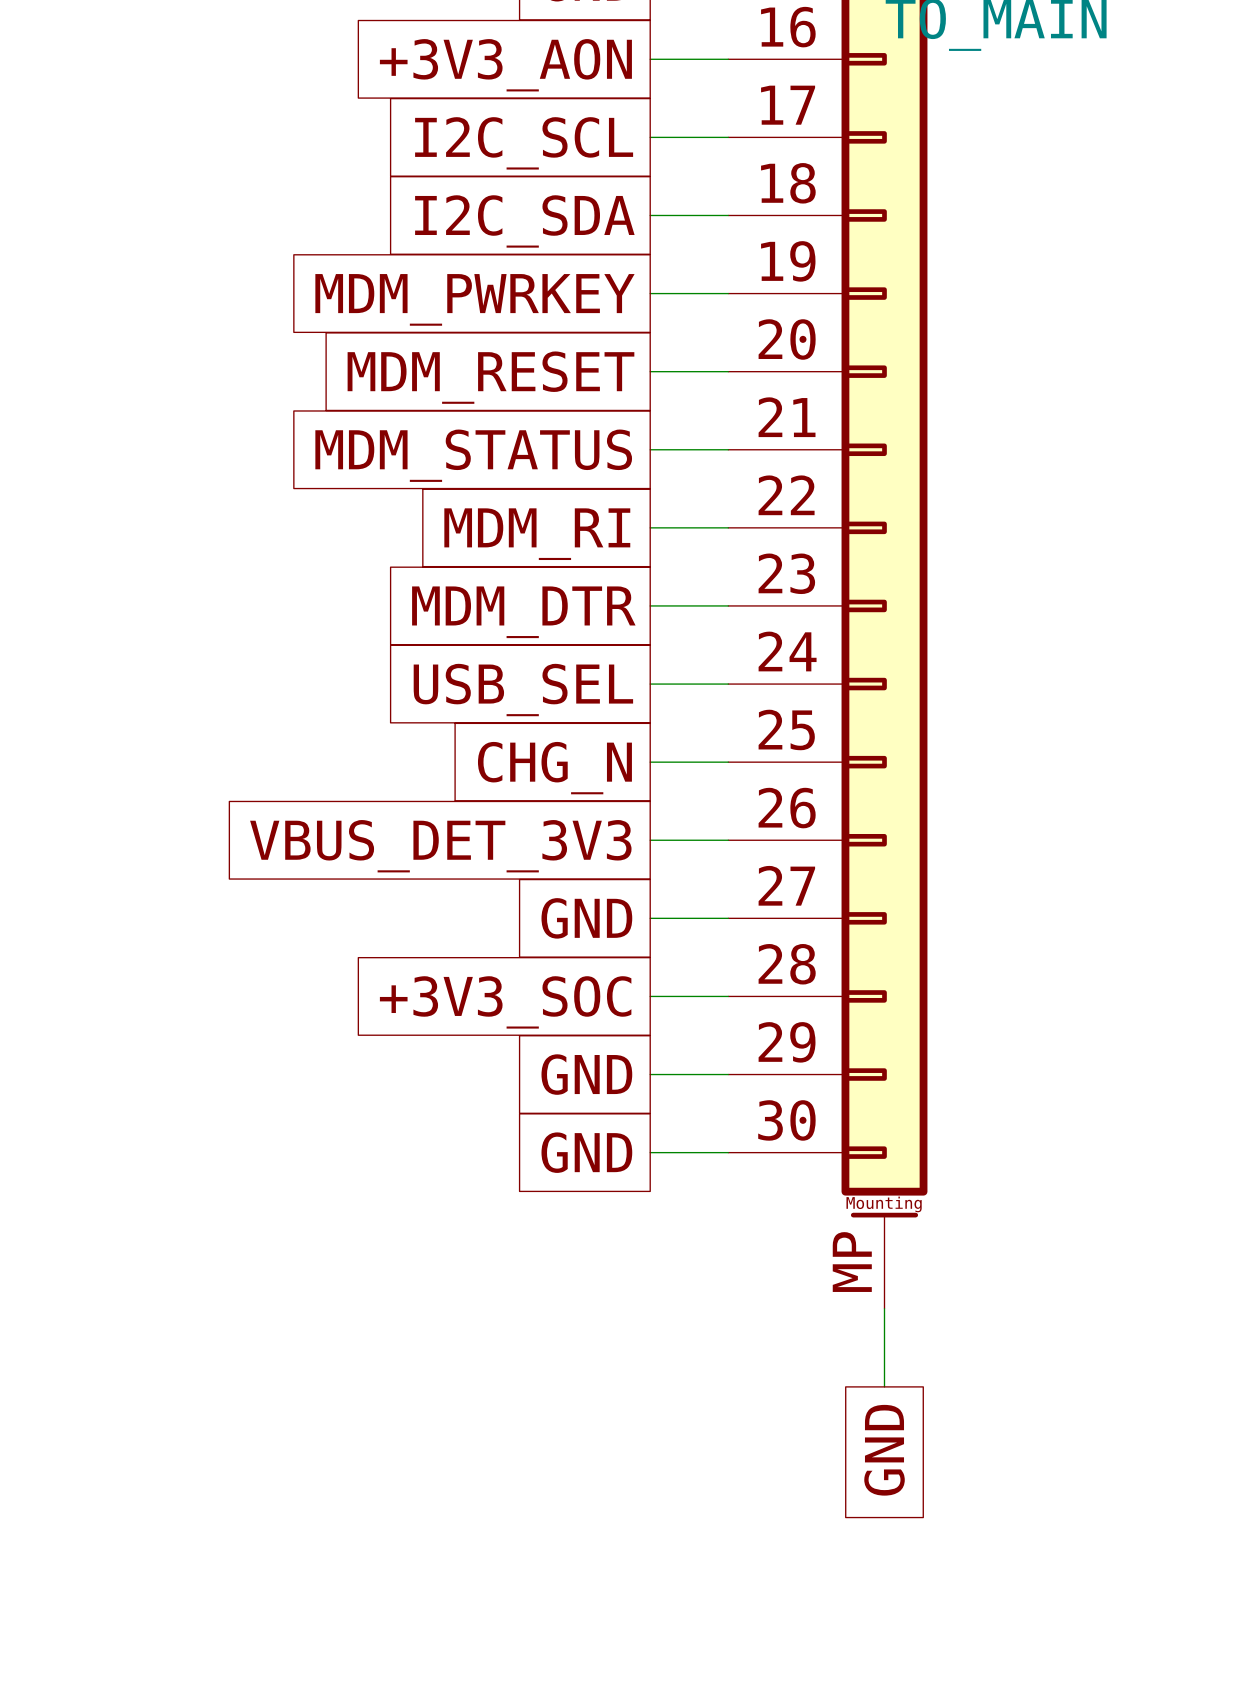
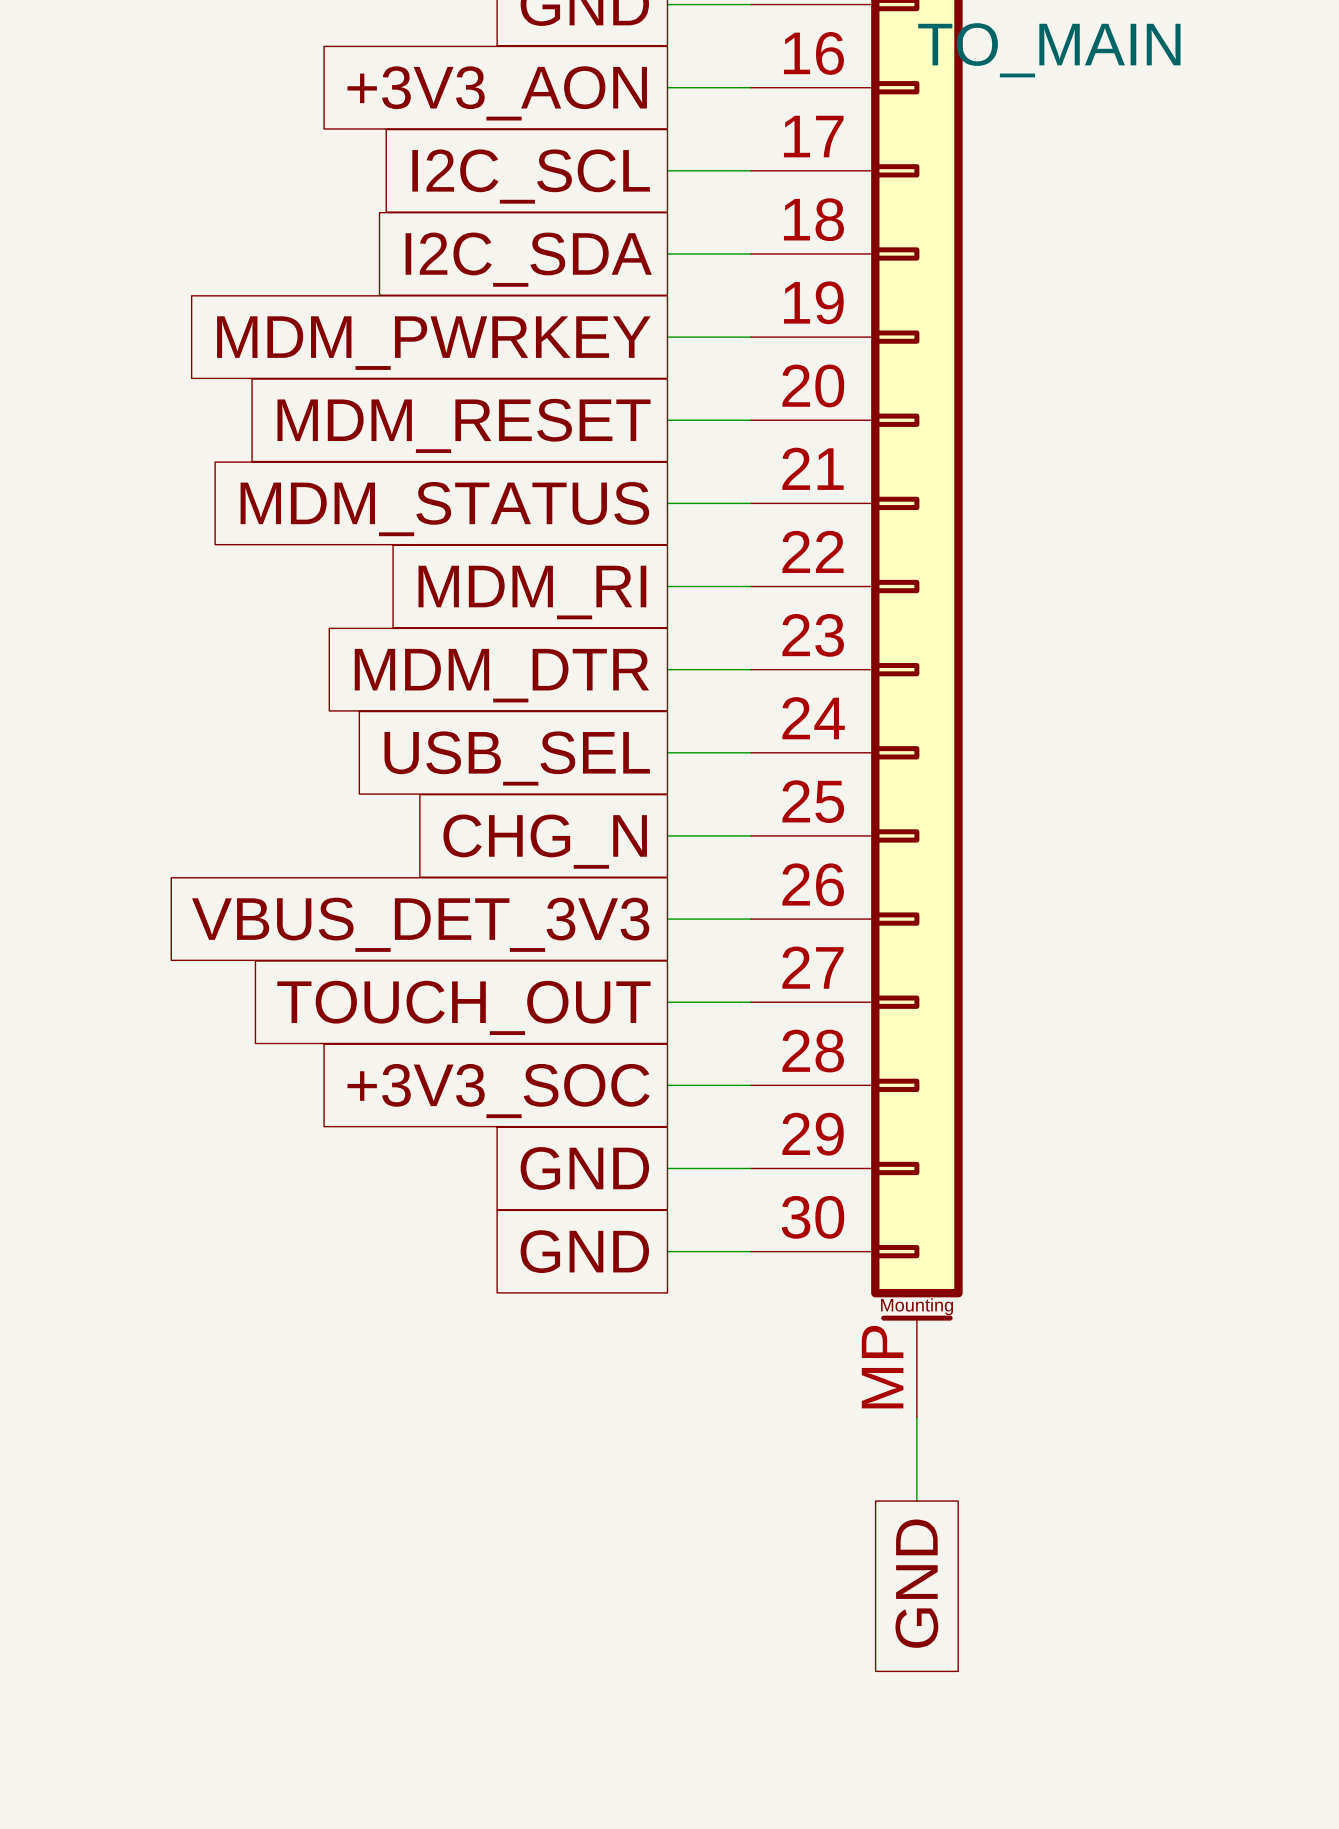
global label: GND (586, 918) -> TOUCH_OUT (463, 1007)

